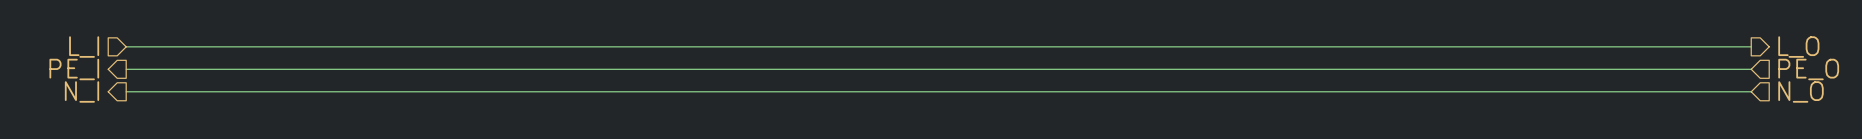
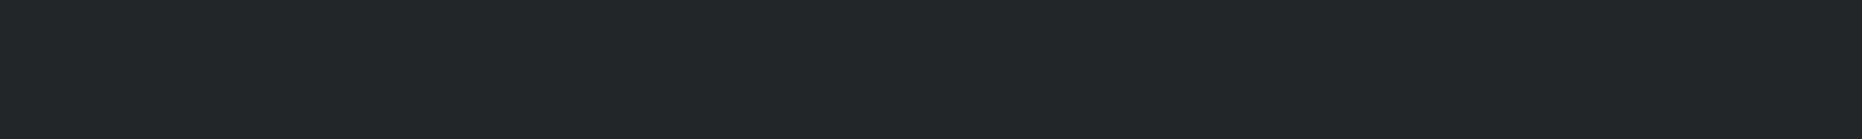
wire: (126, 46) (1751, 46) -> none
hierarchical label: L_I (84, 47) -> none
hierarchical label: L_O (1798, 47) -> none
hierarchical label: PE_I (74, 69) -> none
wire: (126, 69) (1751, 69) -> none
hierarchical label: PE_O (1808, 69) -> none
hierarchical label: N_I (82, 91) -> none
wire: (126, 91) (1751, 91) -> none
hierarchical label: N_O (1800, 91) -> none

